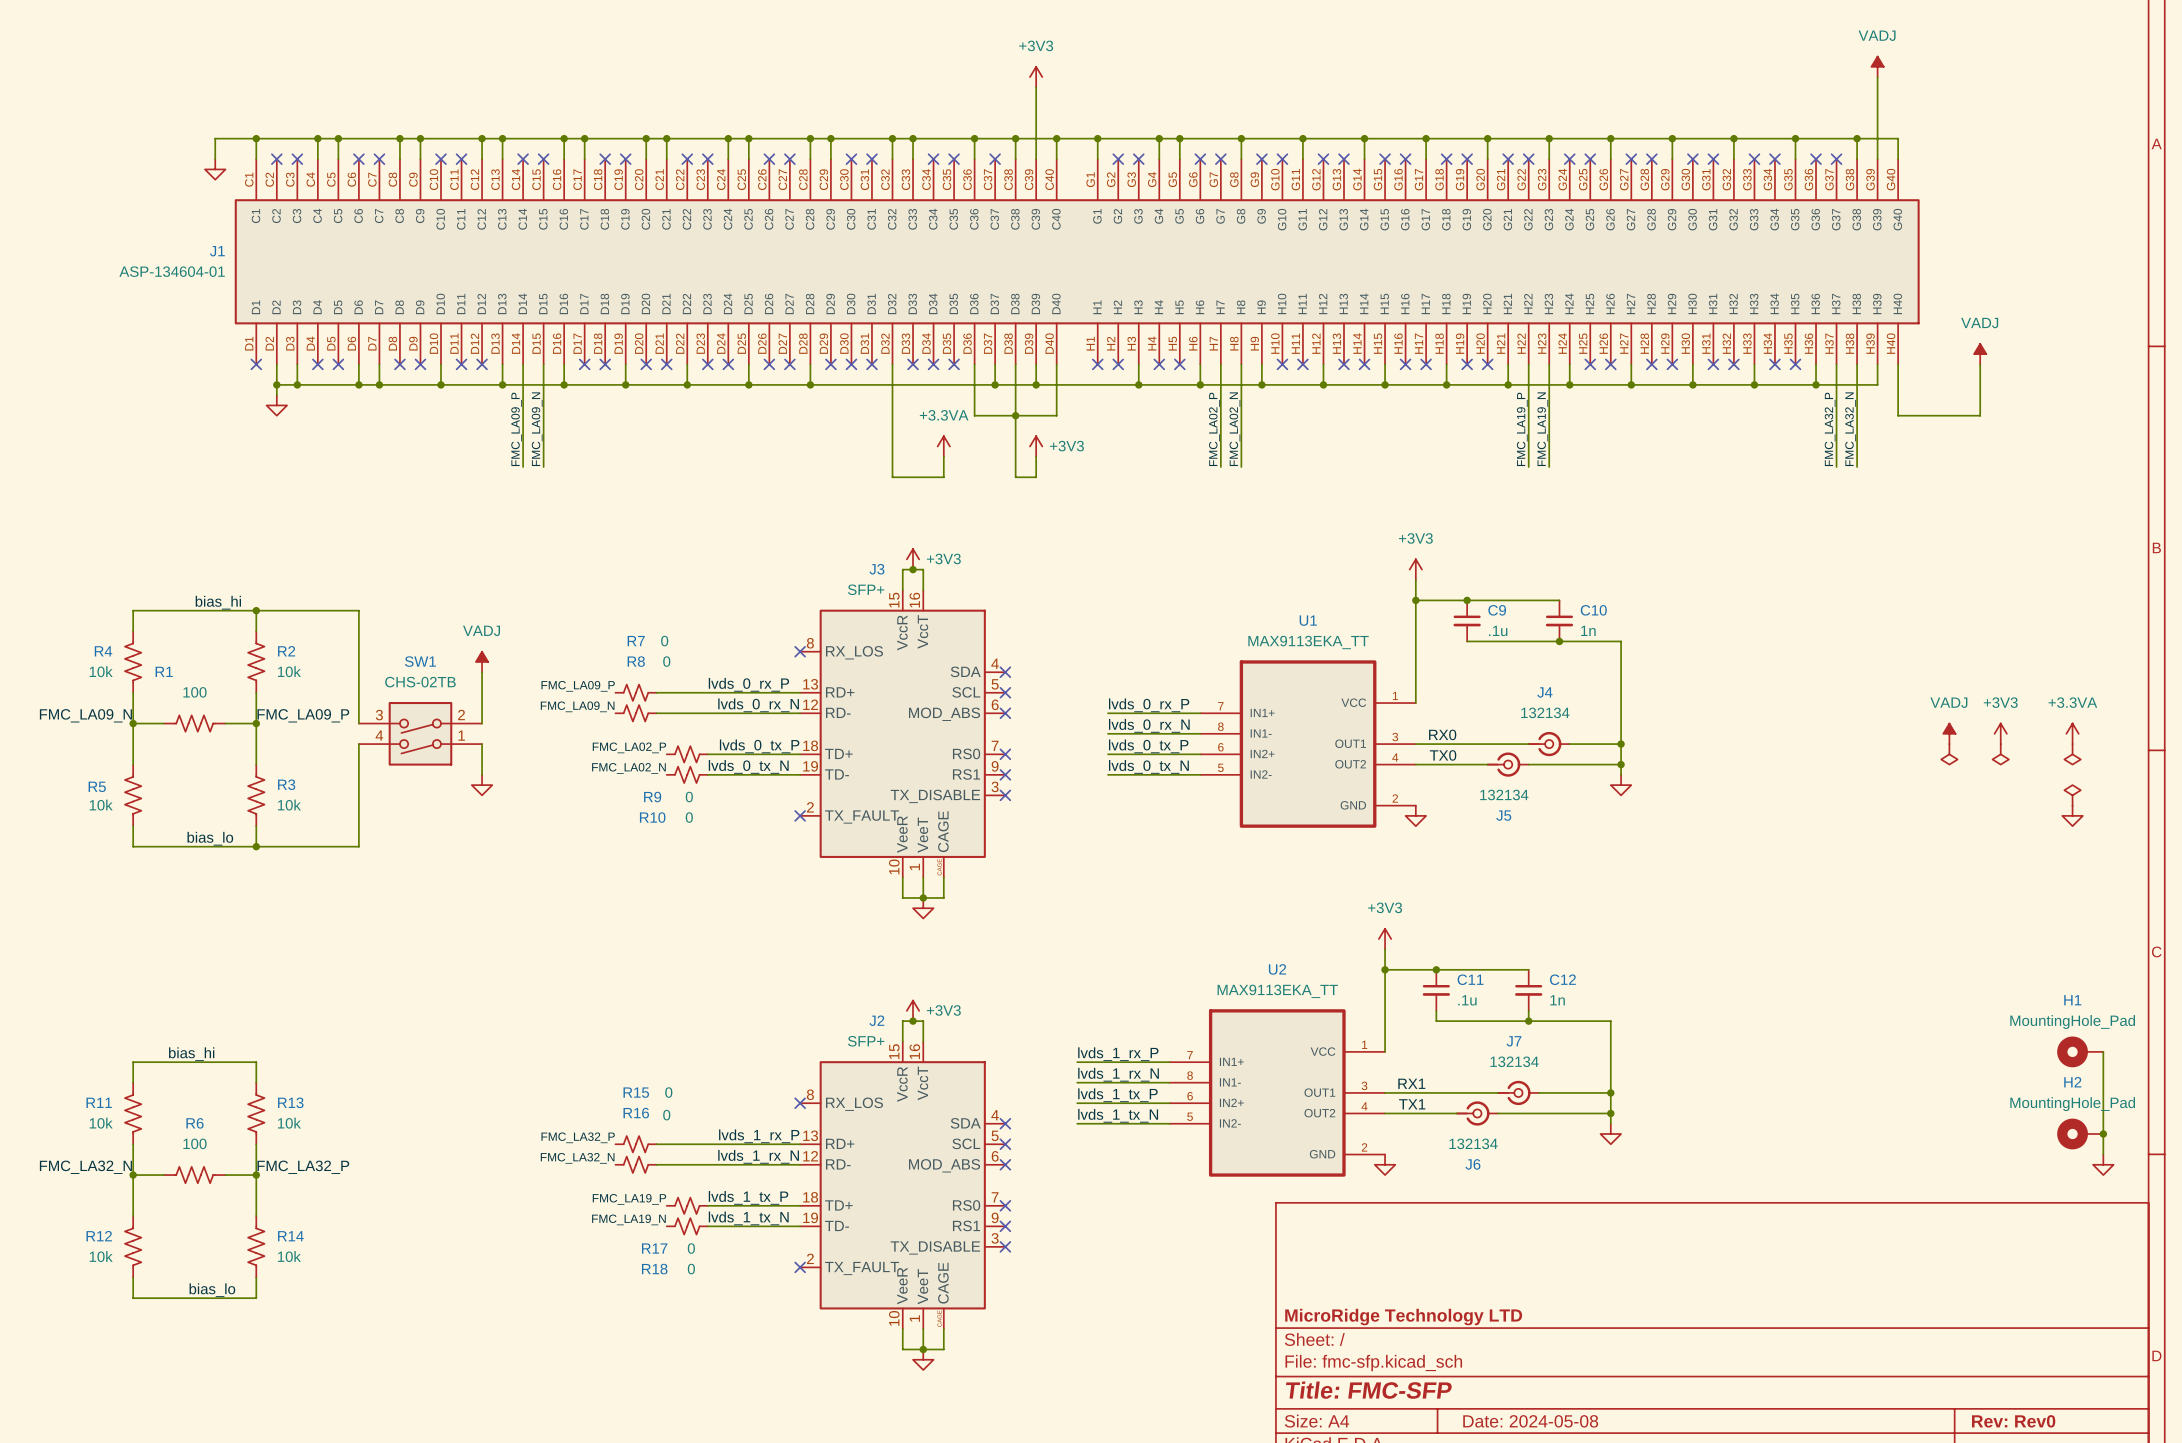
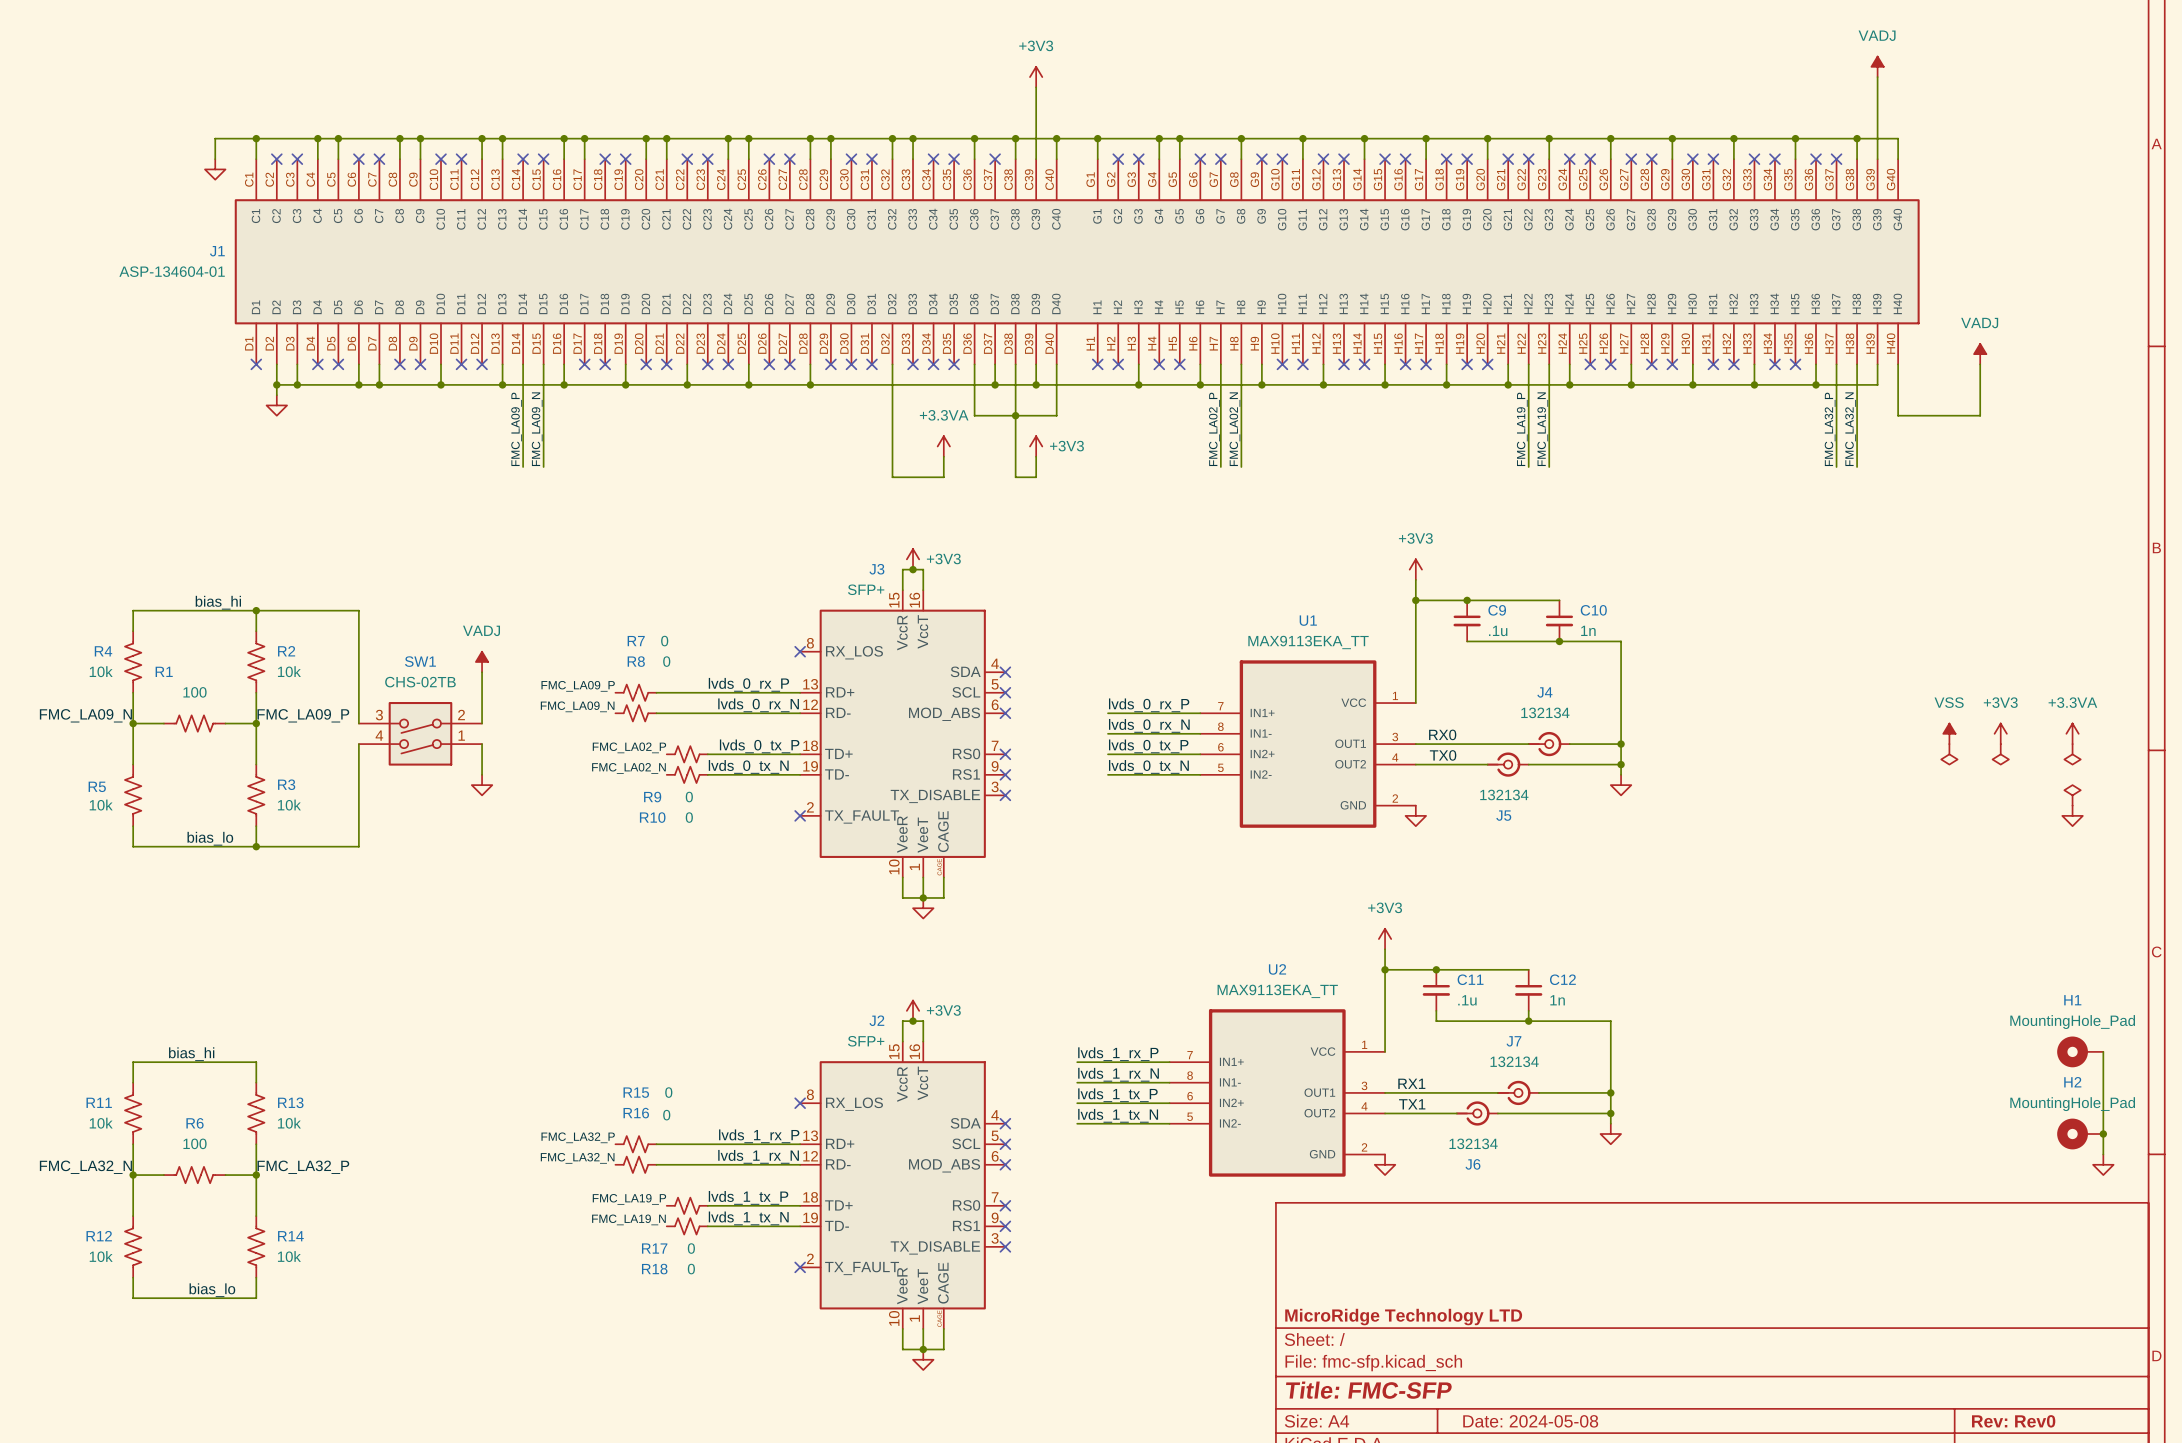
power symbol: VADJ (1949, 733) -> VSS (1949, 733)

